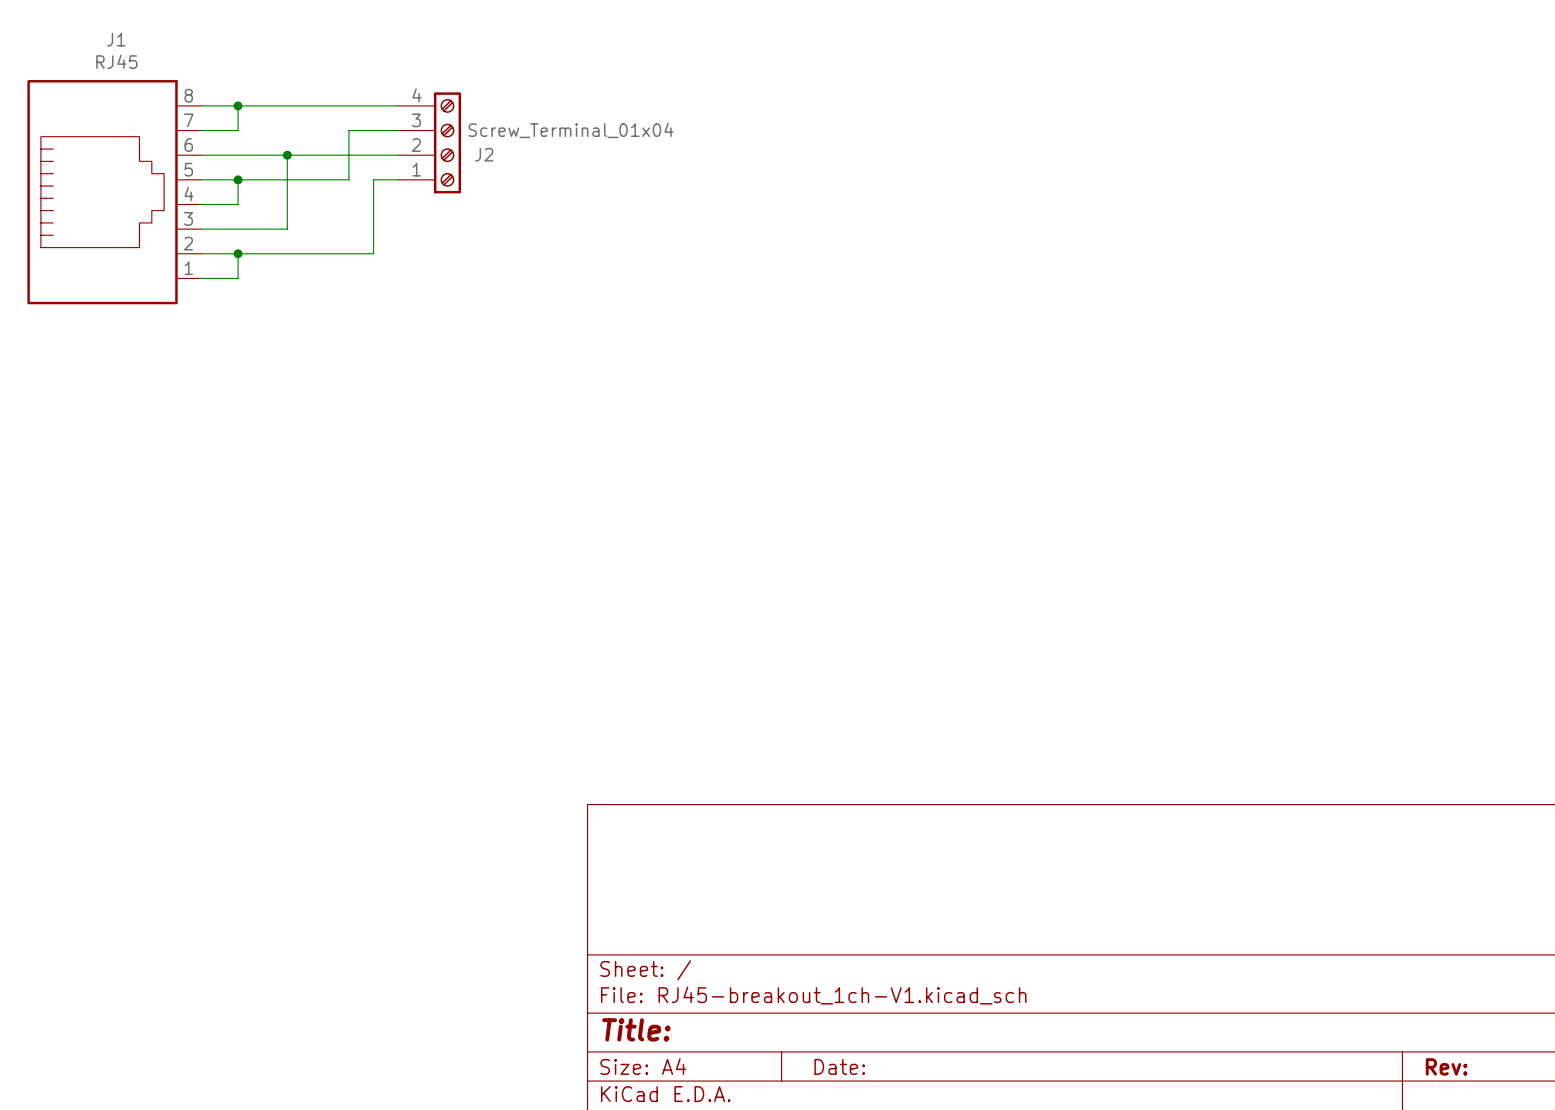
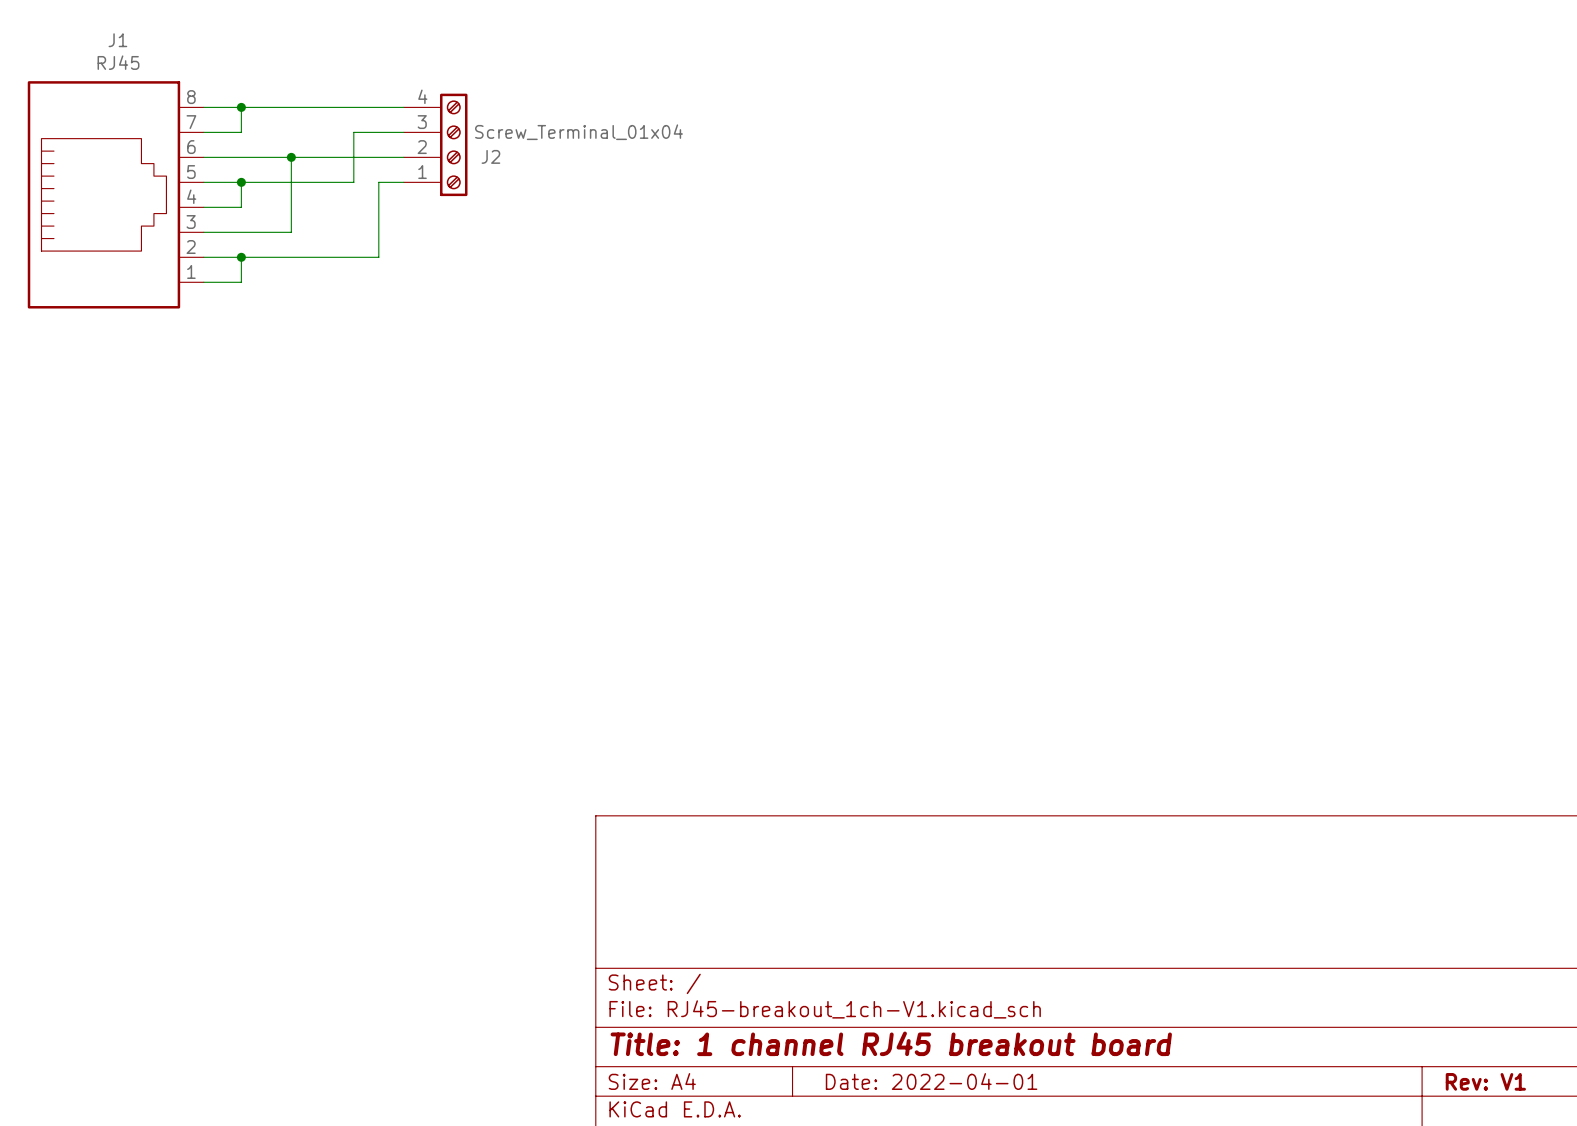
title block: Title: (636, 1029) -> Title: 1 channel RJ45 breakout board (891, 1043)
title block: Date: (839, 1066) -> Date: 2022-04-01 (931, 1081)
title block: Rev: (1446, 1066) -> Rev: V1 (1485, 1081)

